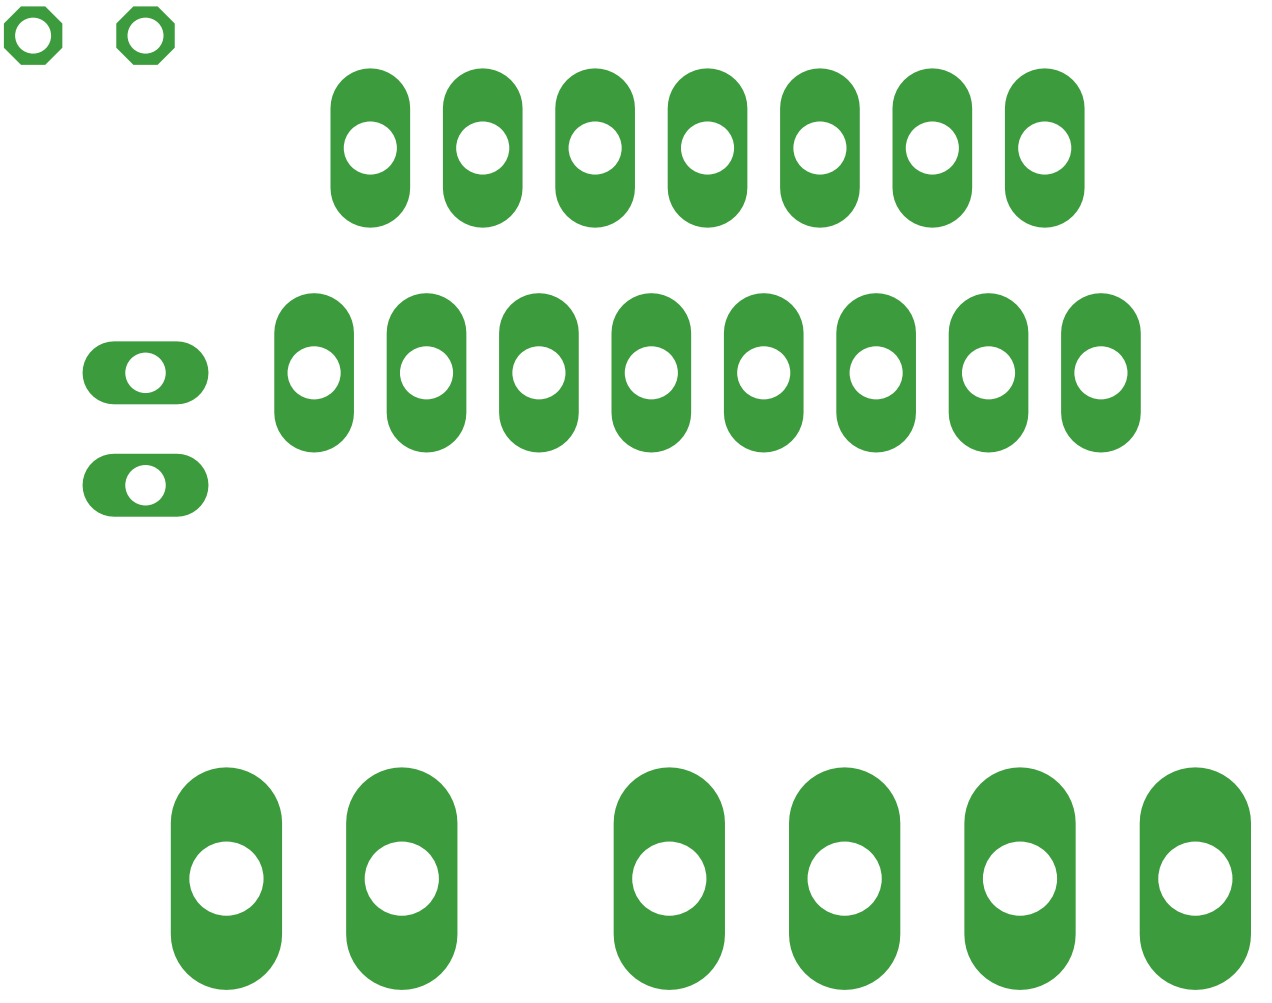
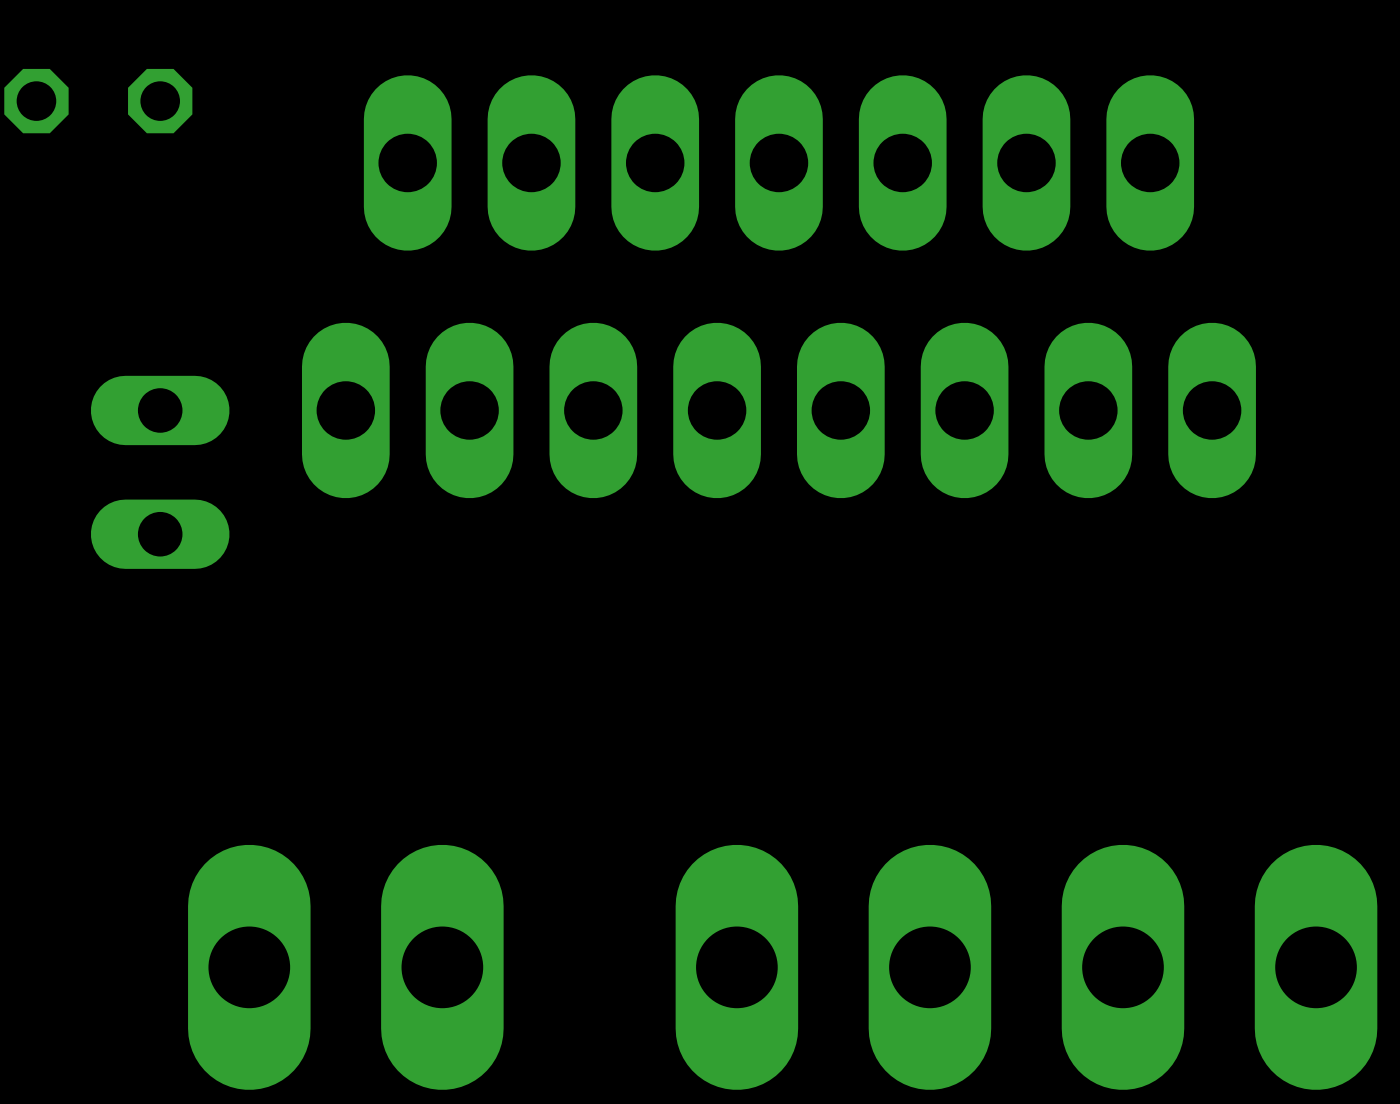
part position: (89, 35) -> (98, 101)

